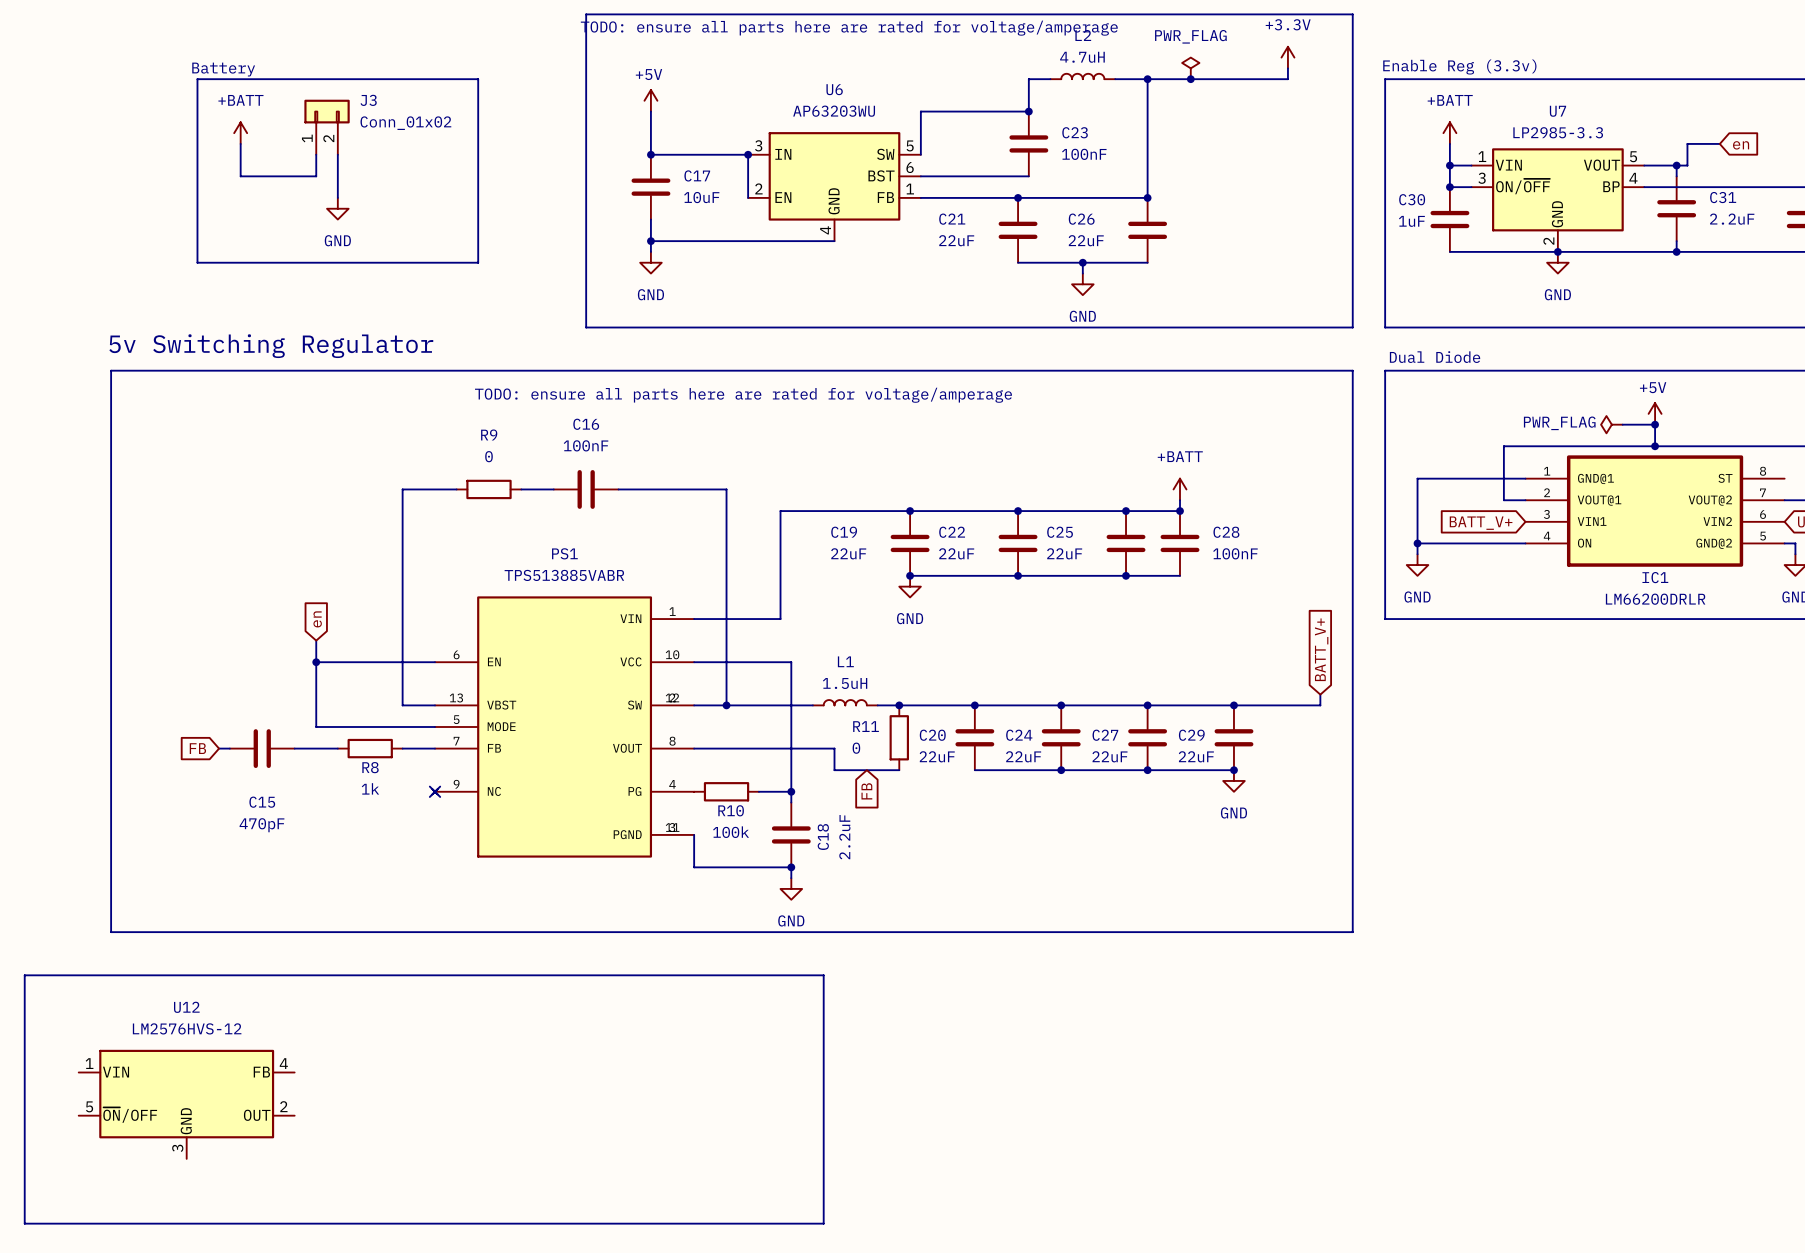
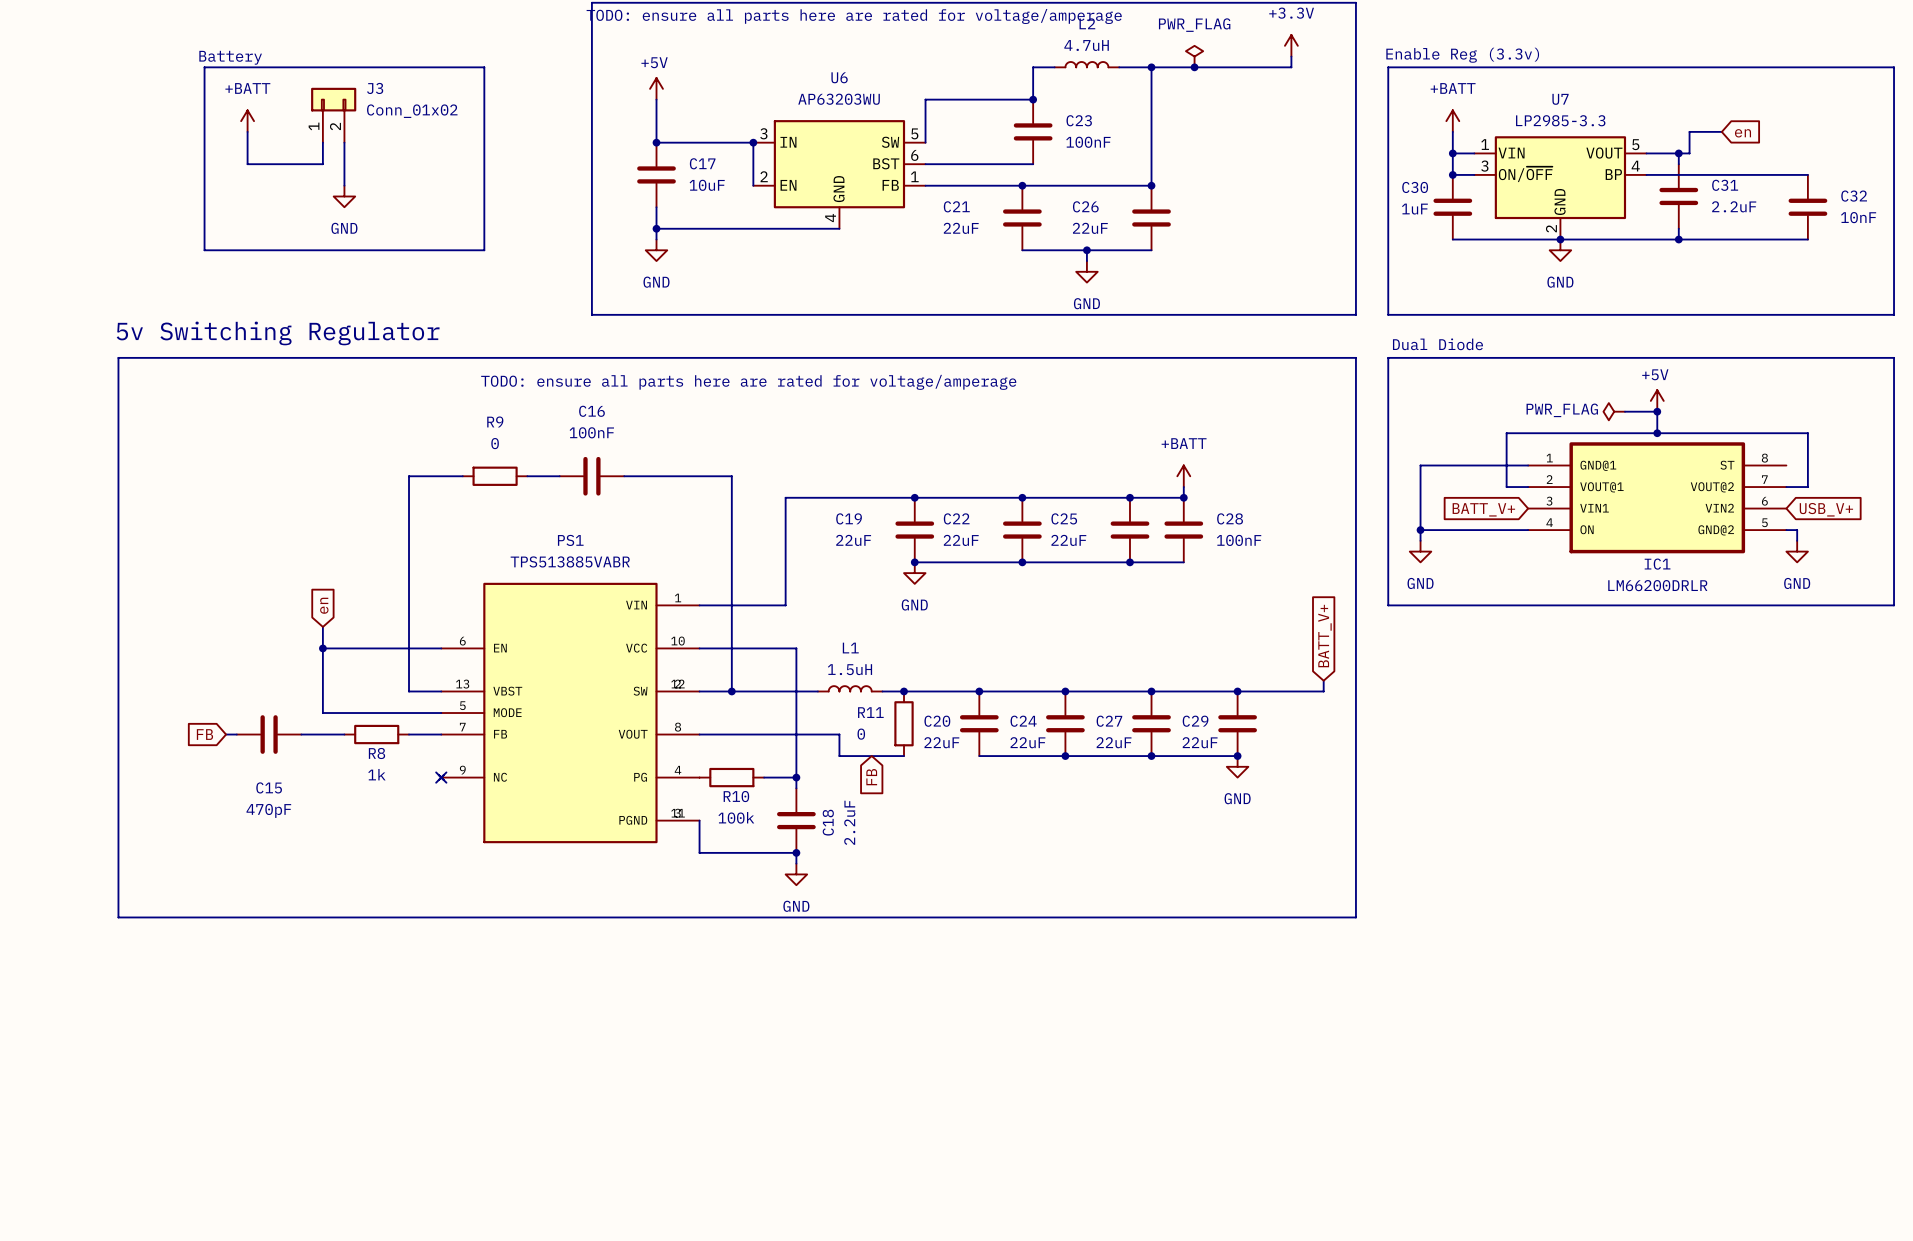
line: (24, 975) (823, 975) (823, 1223) (24, 1223) (24, 975) -> none
U12: LM2576HVS-12 (186, 1104) -> none

